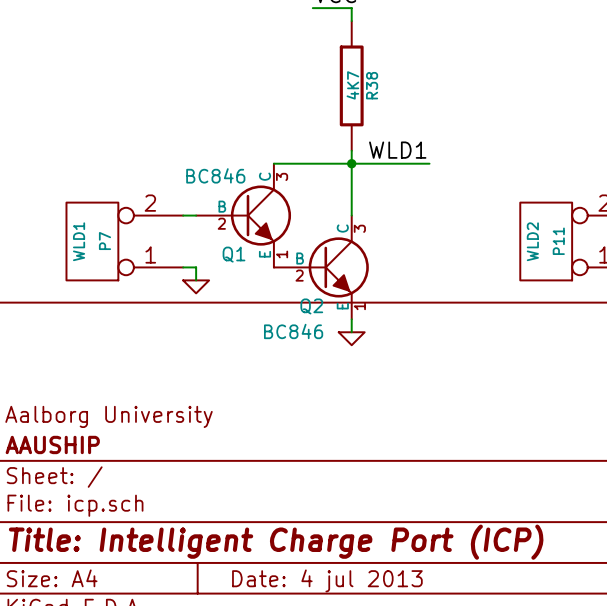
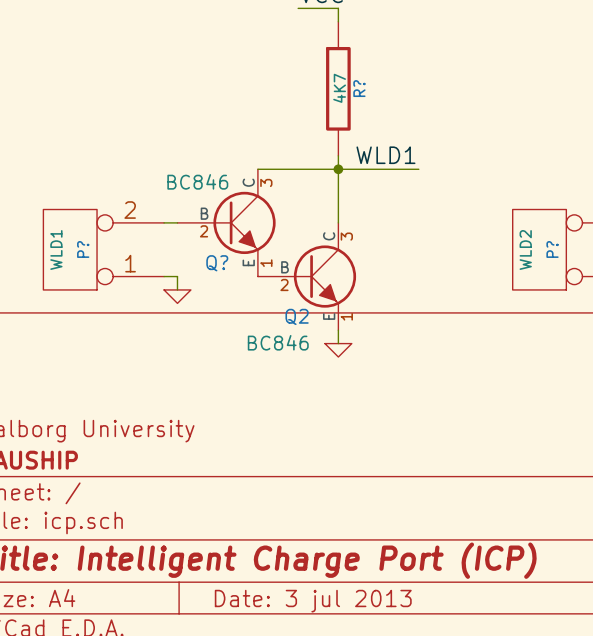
R38 name: R38 (372, 85) -> R? (359, 88)
P7 name: P7 (104, 241) -> P? (83, 249)
P11 name: P11 (558, 241) -> P? (552, 249)
Q1 name: Q1 (234, 254) -> Q? (217, 263)
title block: Date: 4 jul 2013 (327, 580) -> Date: 3 jul 2013 (313, 601)

